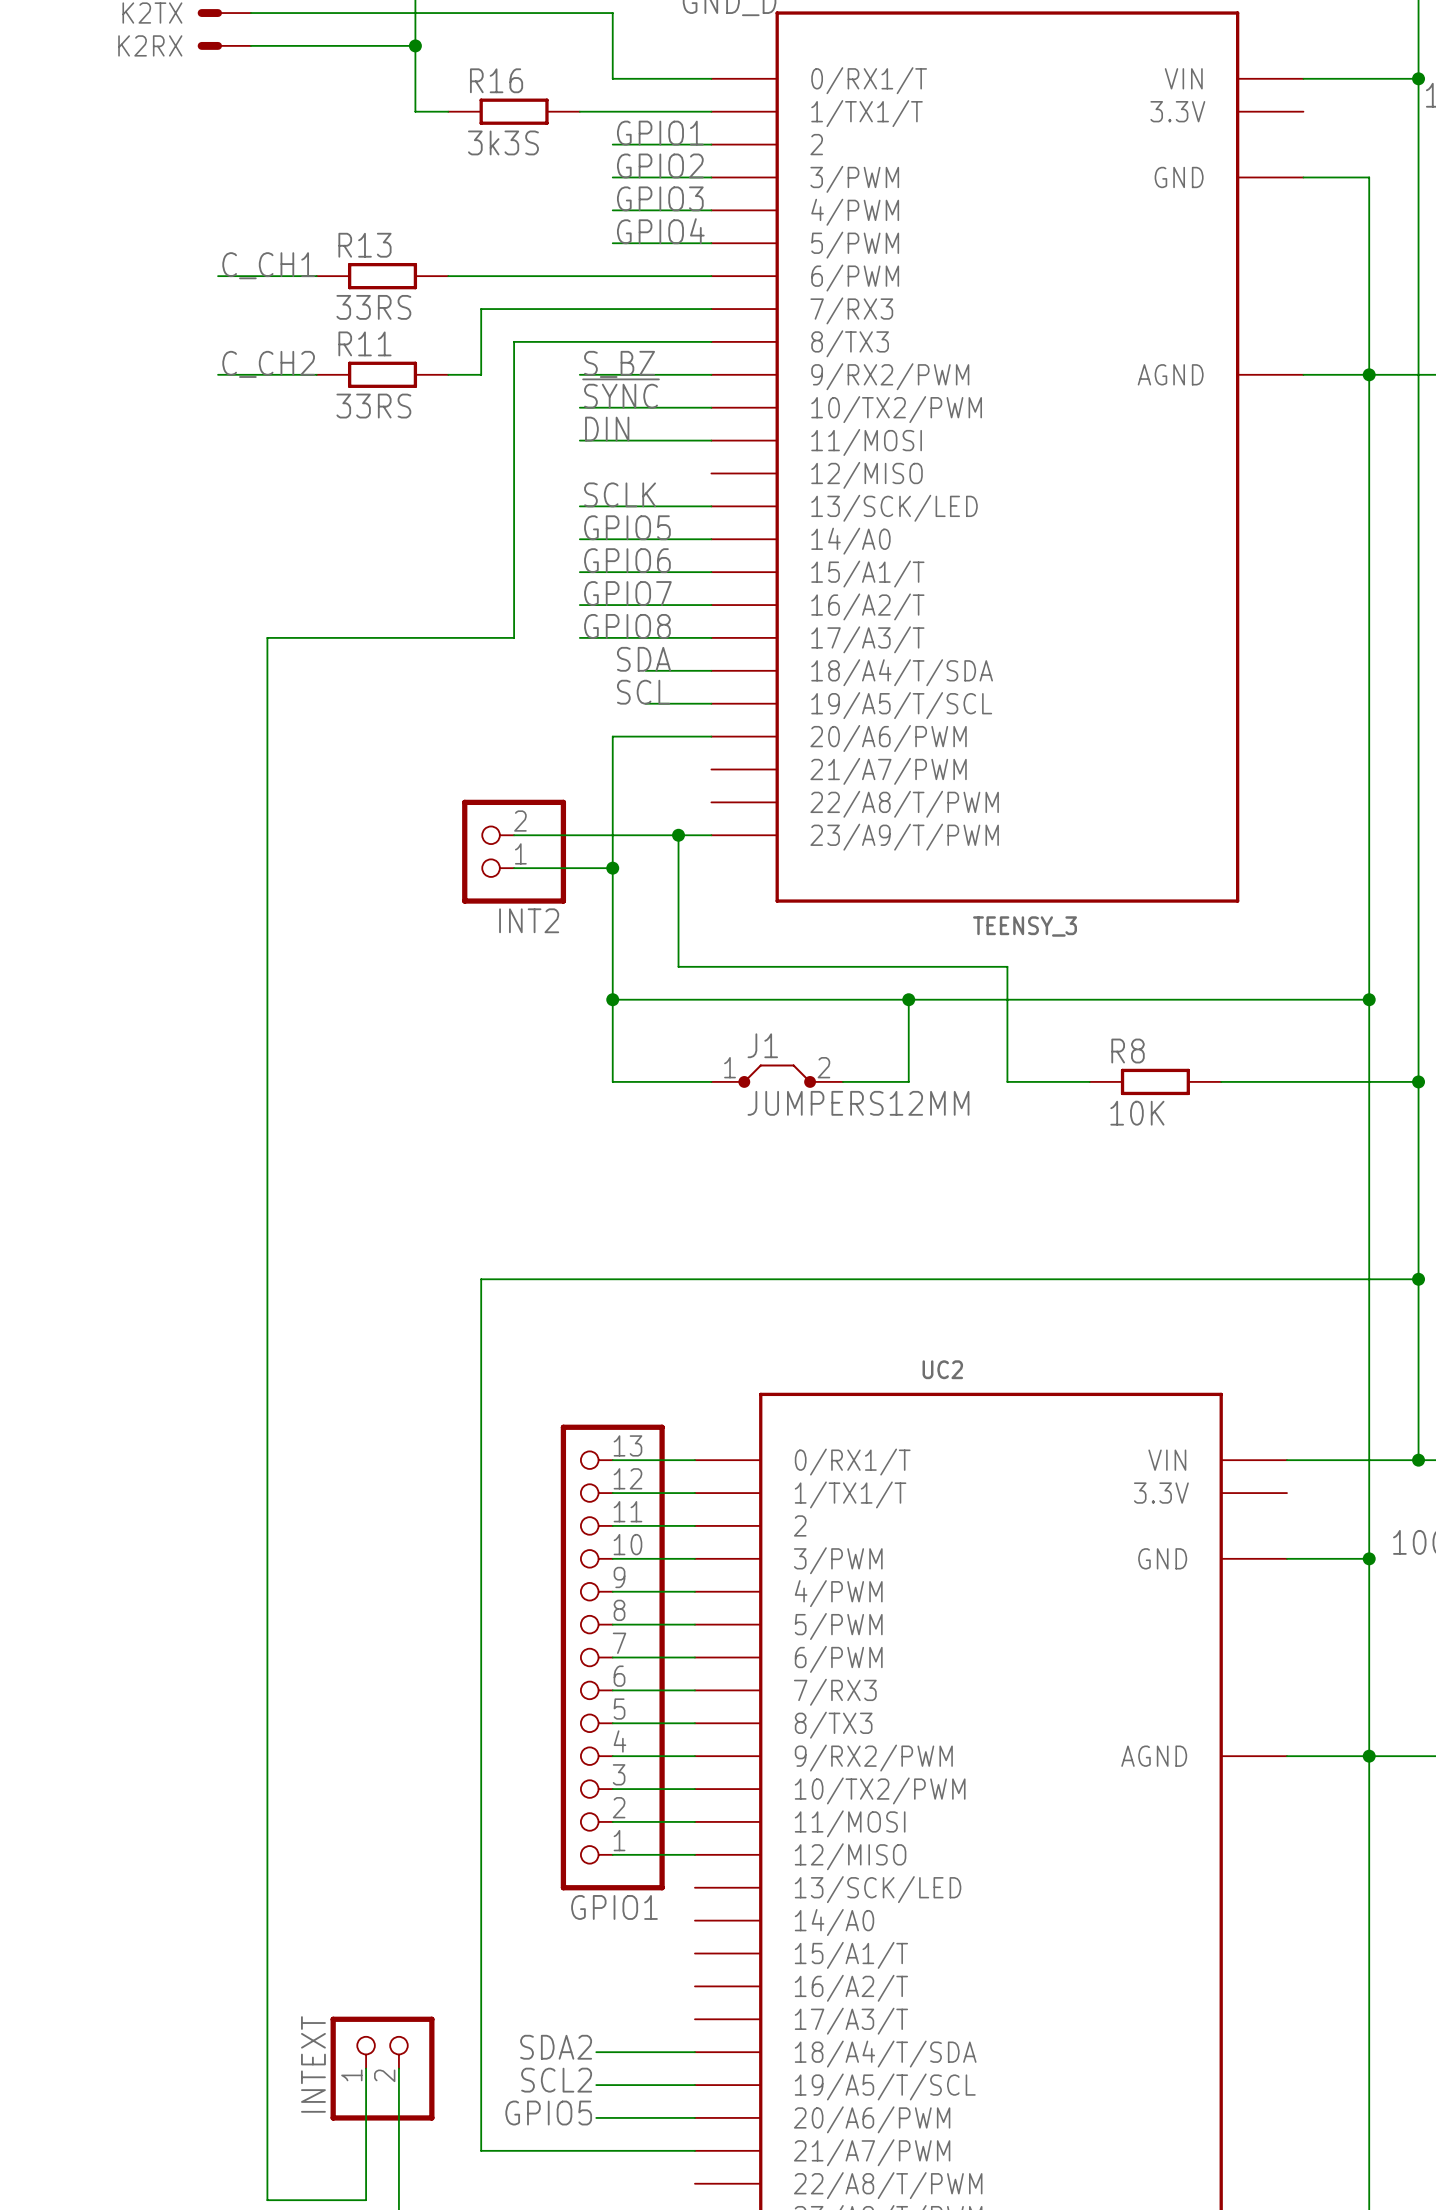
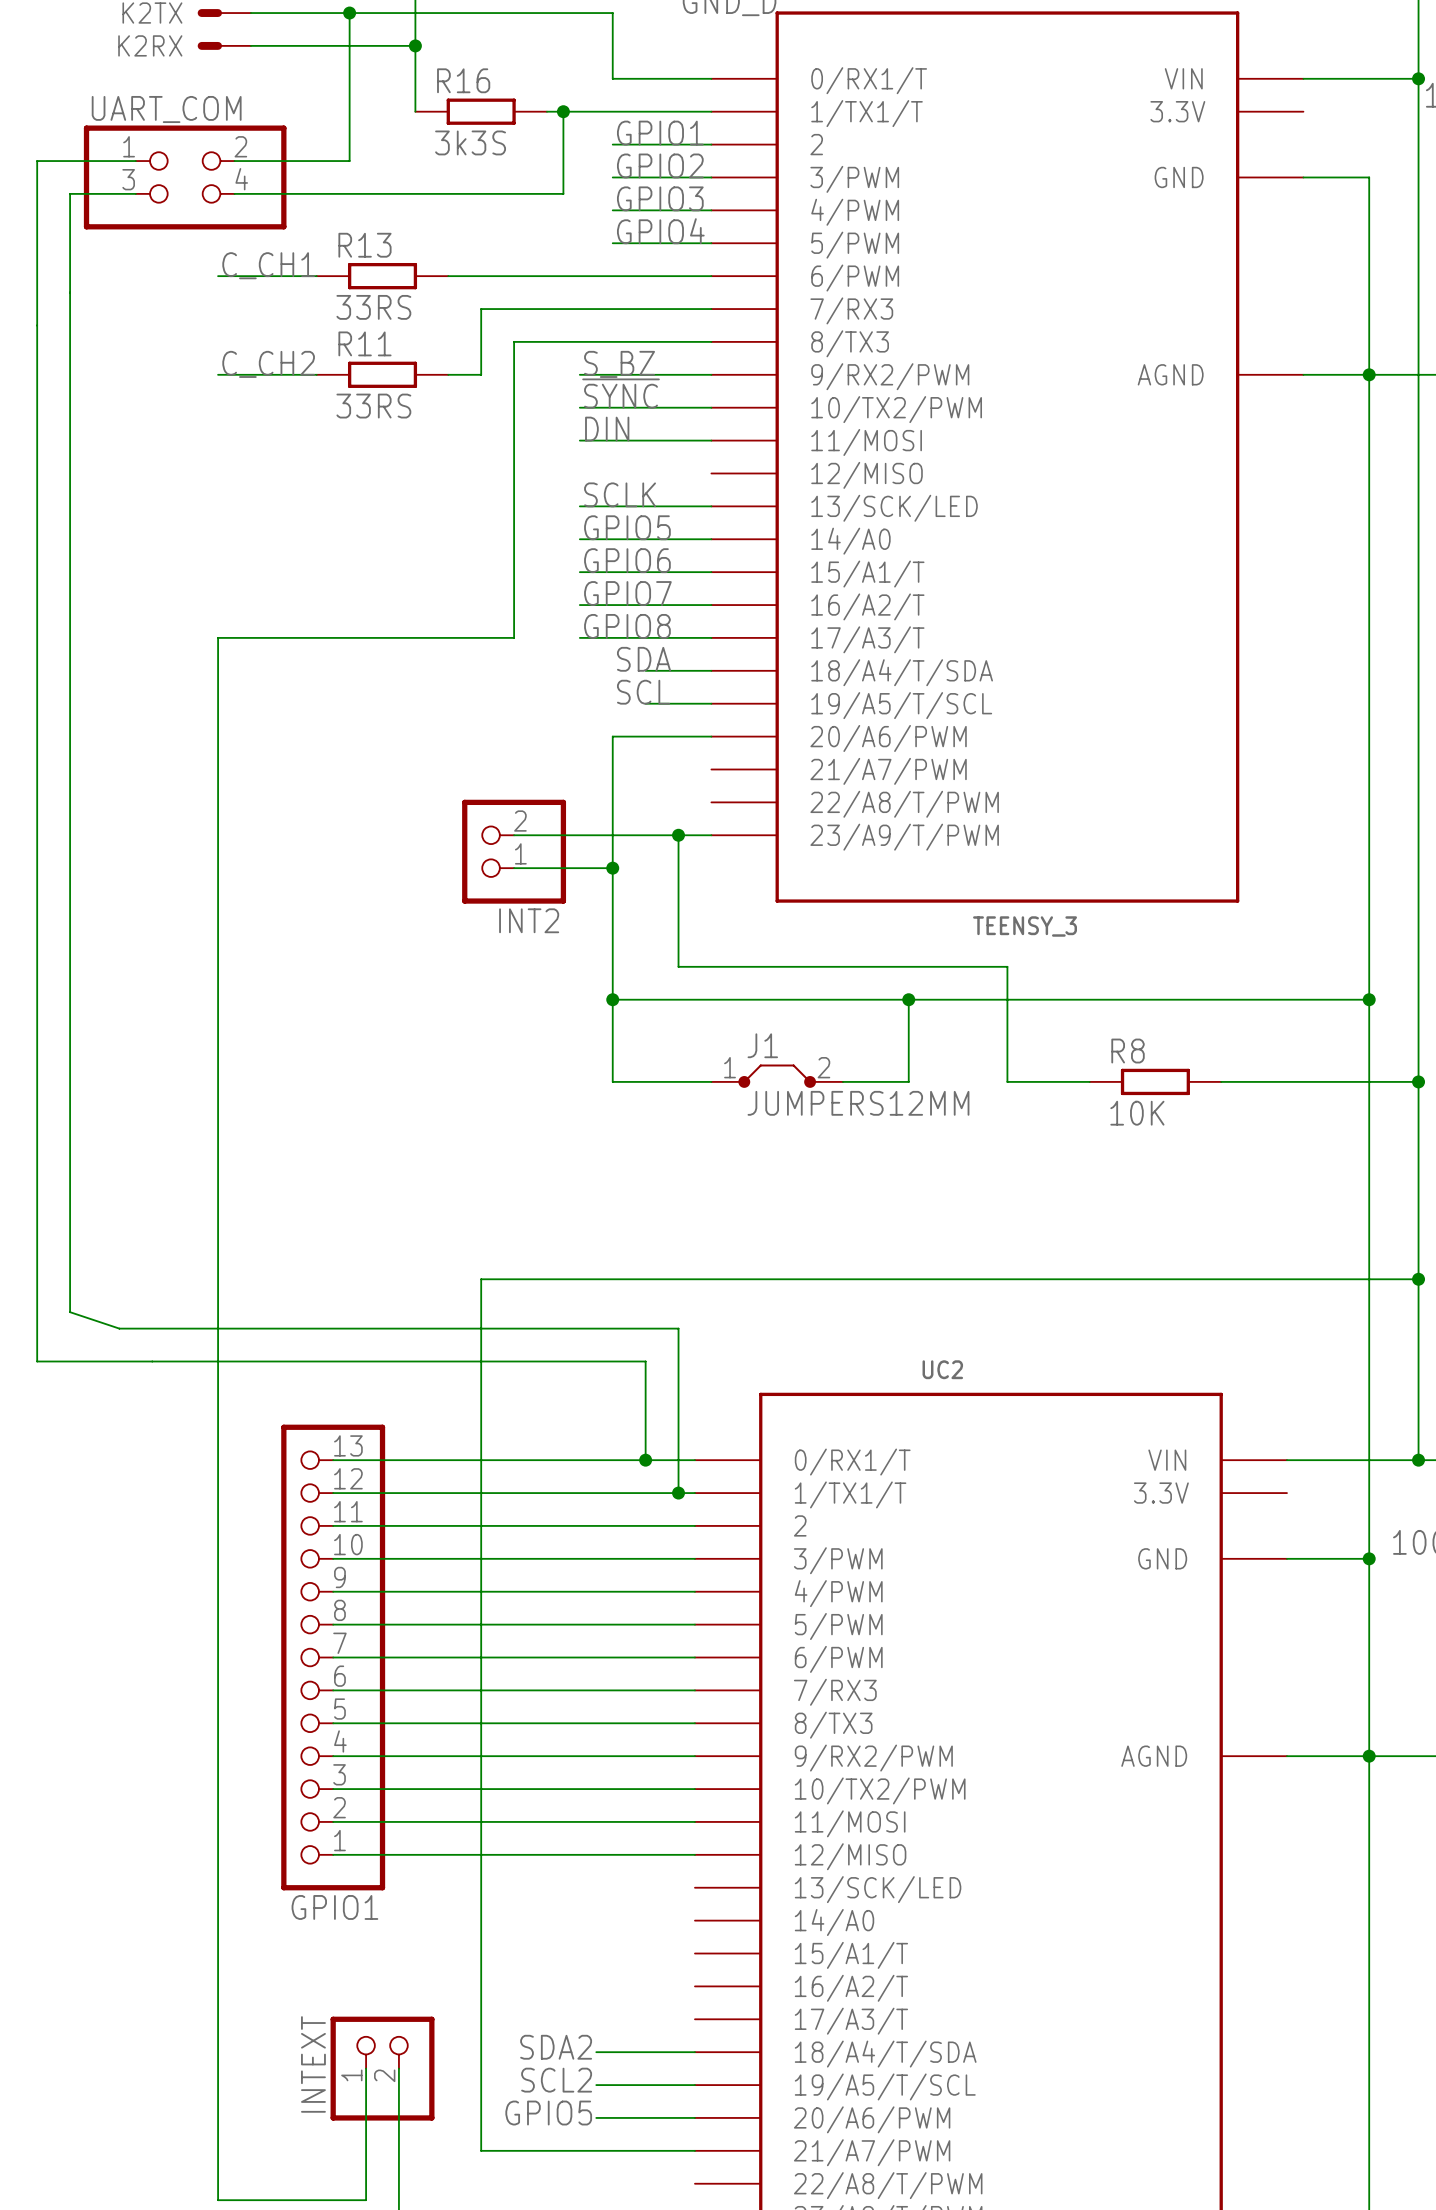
wire: none -> (349, 13) (349, 161) (234, 161)
junction: none -> (349, 13)
R16 position: (514, 111) -> (481, 111)
wire: none -> (563, 111) (563, 193) (234, 193)
junction: none -> (563, 111)
wire: none -> (135, 161) (37, 161) (37, 1361) (645, 1361) (645, 1460)
UART_COM: none -> (185, 177)
wire: none -> (135, 193) (70, 193) (70, 1312) (119, 1328) (678, 1328) (678, 1493)
wire: (267, 637) (267, 2200) -> (267, 637) (218, 637) (218, 2200) (267, 2200)
wire: none -> (333, 1460) (612, 1460)
junction: none -> (645, 1460)
wire: none -> (333, 1493) (612, 1493)
junction: none -> (678, 1493)
wire: none -> (333, 1525) (612, 1525)
wire: none -> (333, 1558) (612, 1558)
wire: none -> (333, 1591) (612, 1591)
wire: none -> (333, 1624) (612, 1624)
wire: none -> (333, 1657) (612, 1657)
GPIO1 position: (612, 1657) -> (333, 1657)
wire: none -> (333, 1690) (612, 1690)
wire: none -> (333, 1723) (612, 1723)
wire: none -> (333, 1756) (612, 1756)
wire: none -> (333, 1789) (612, 1789)
wire: none -> (333, 1821) (612, 1821)
wire: none -> (333, 1854) (612, 1854)

